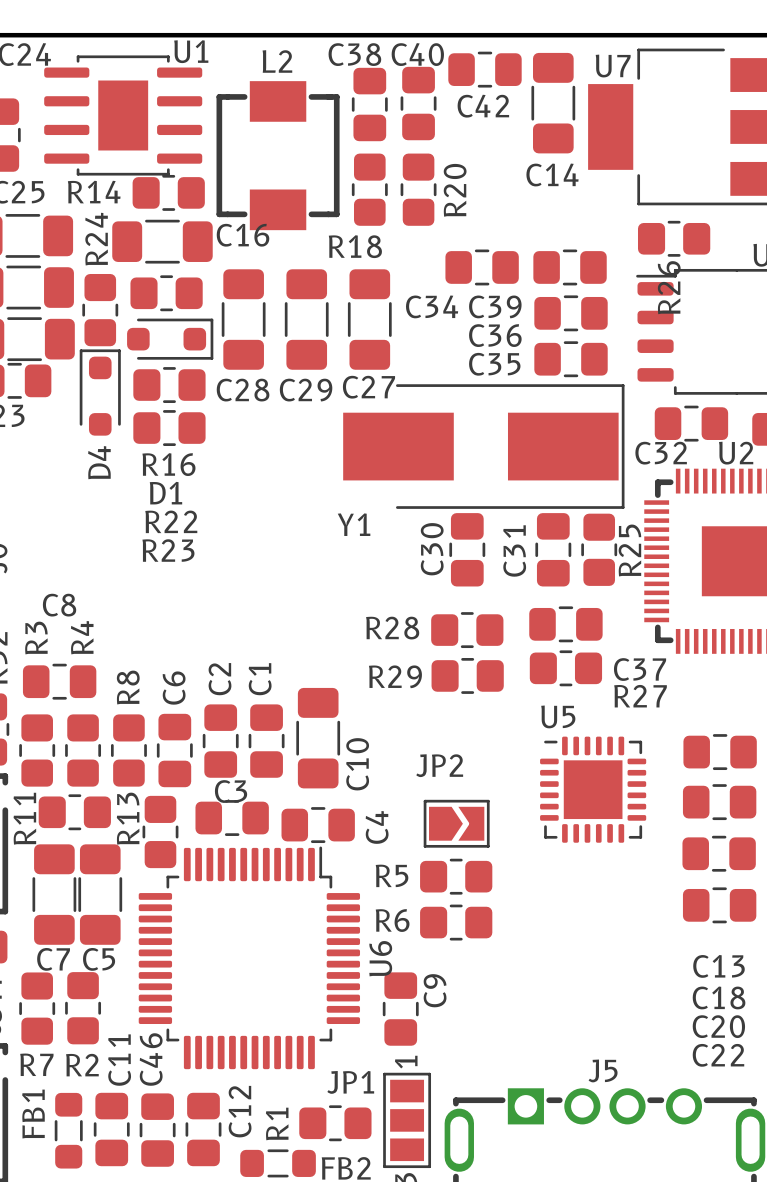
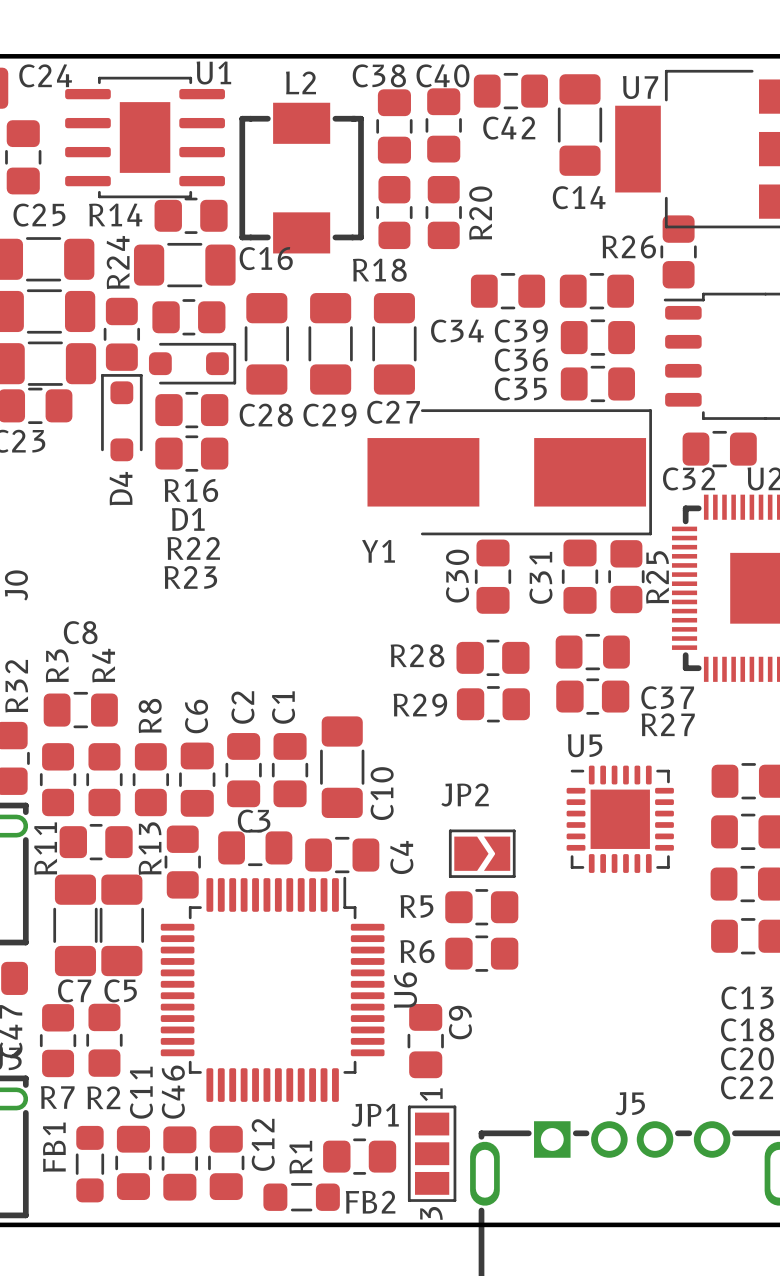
R26 rotation: 0° (674, 238) -> 90° clockwise (678, 251)

